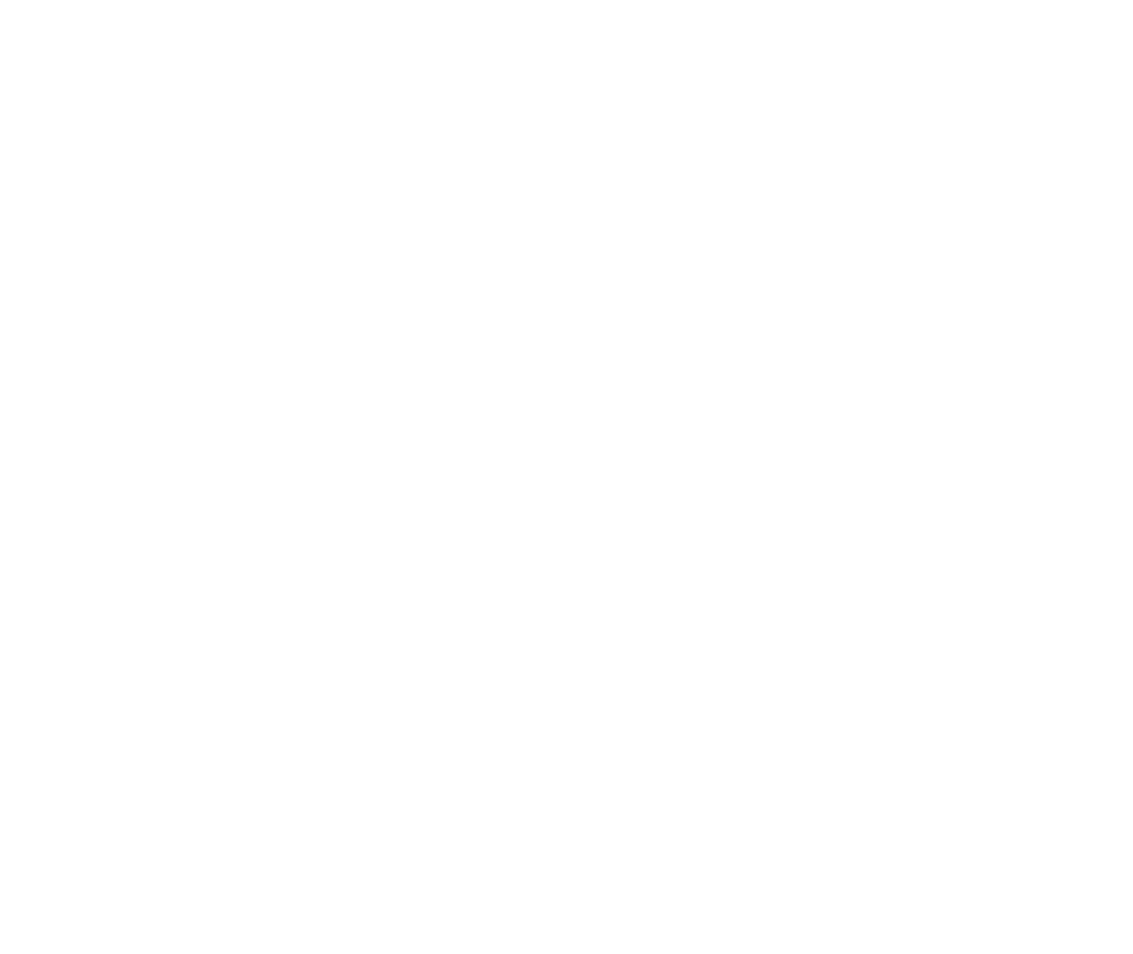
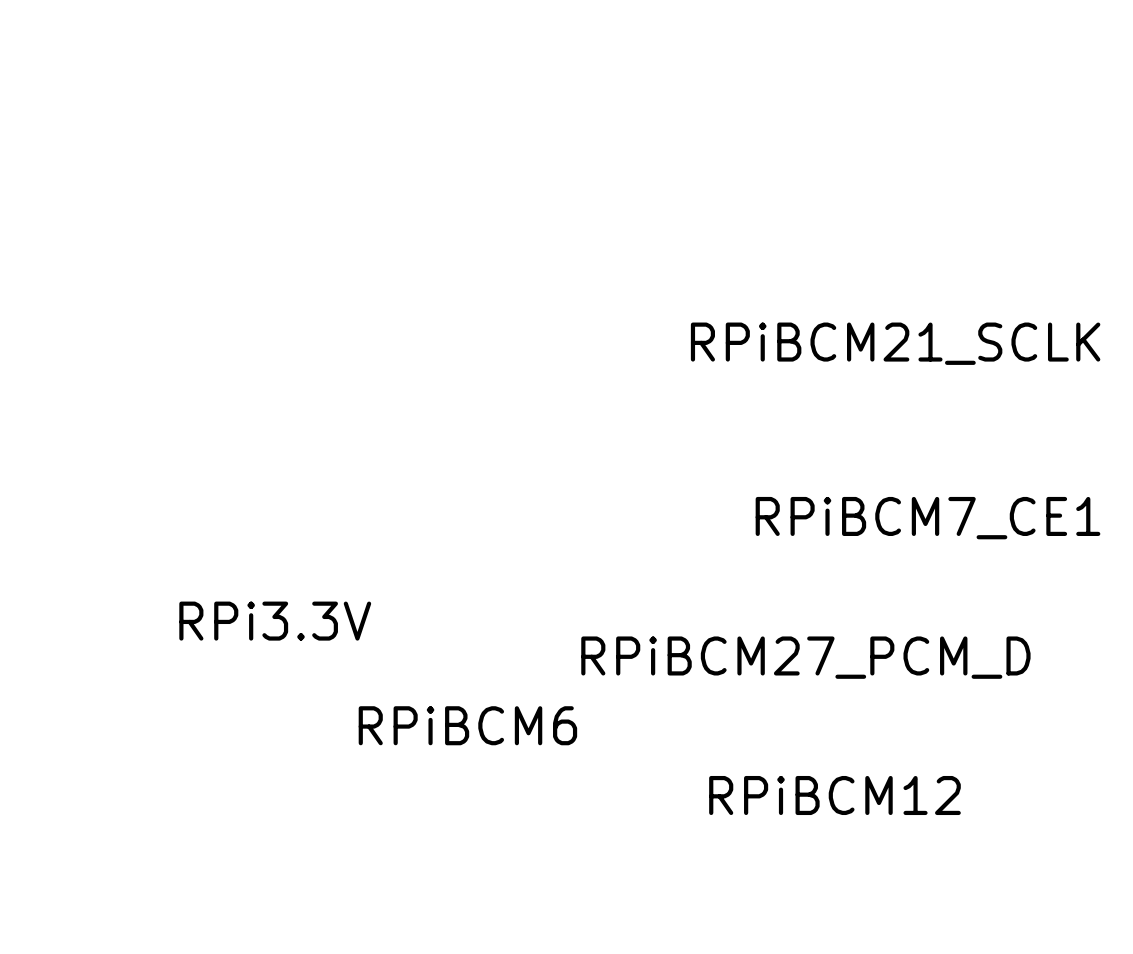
label: none -> RPiBCM21_SCLK (895, 343)
label: none -> RPiBCM7_CE1 (927, 518)
label: none -> RPi3.3V (275, 621)
label: none -> RPiBCM27_PCM_D (805, 657)
label: none -> RPiBCM6 (467, 725)
label: none -> RPiBCM12 (834, 795)

